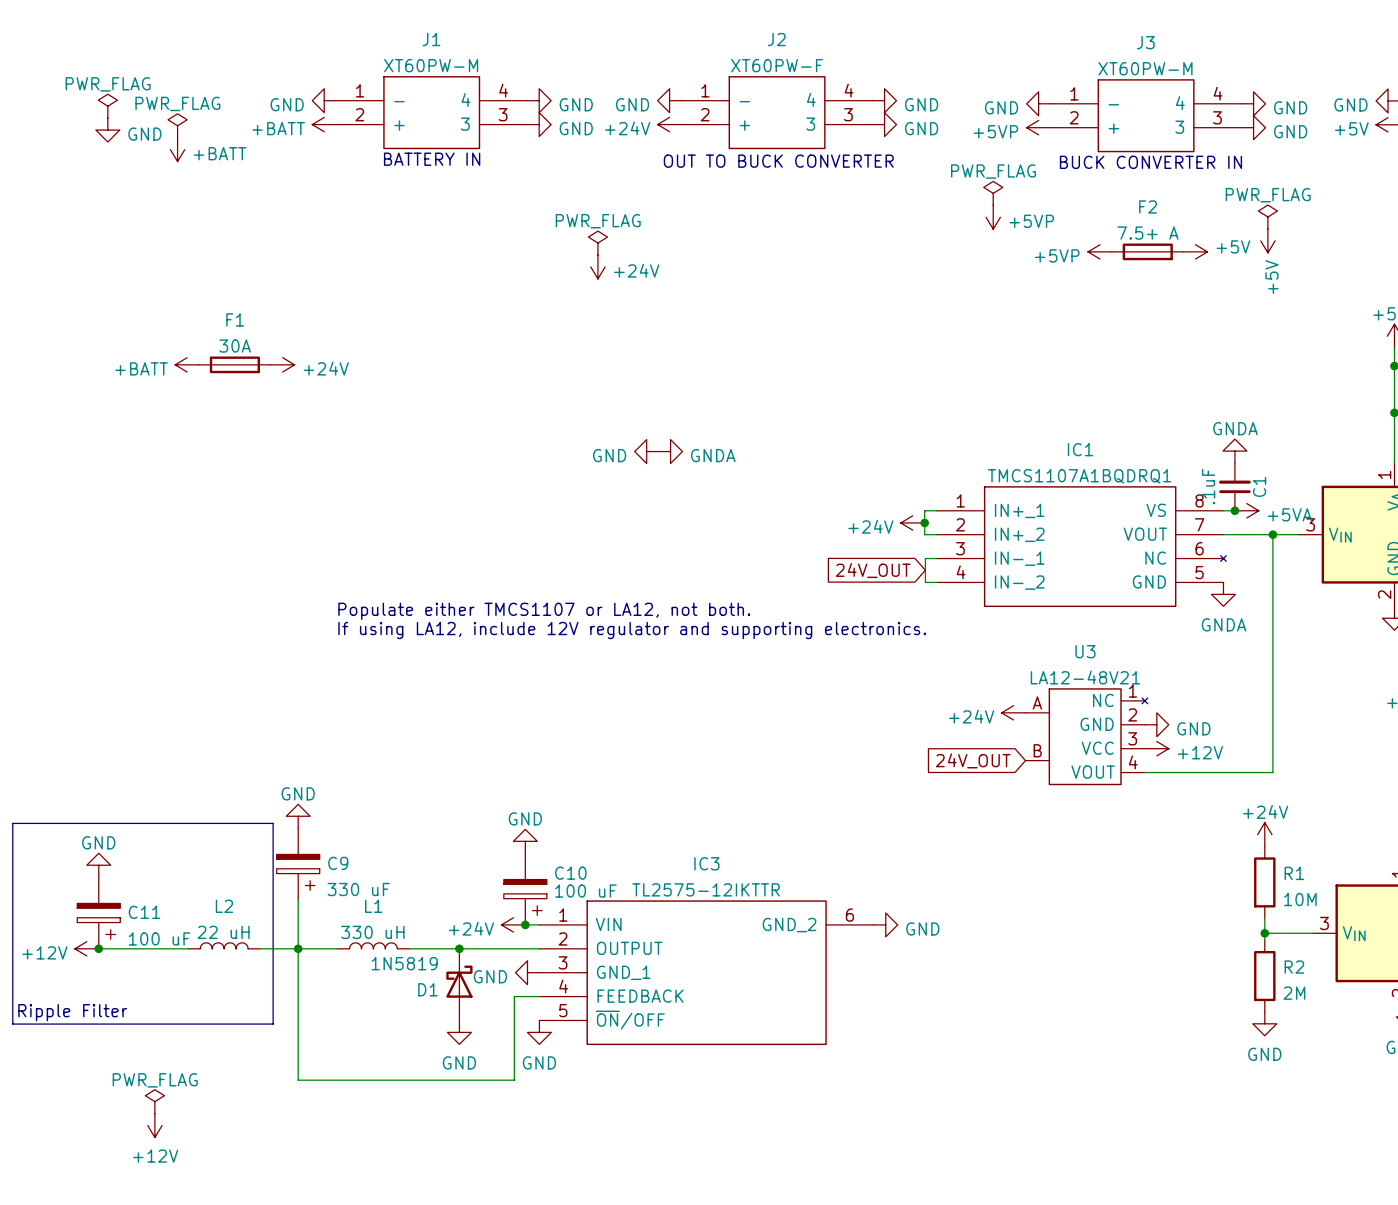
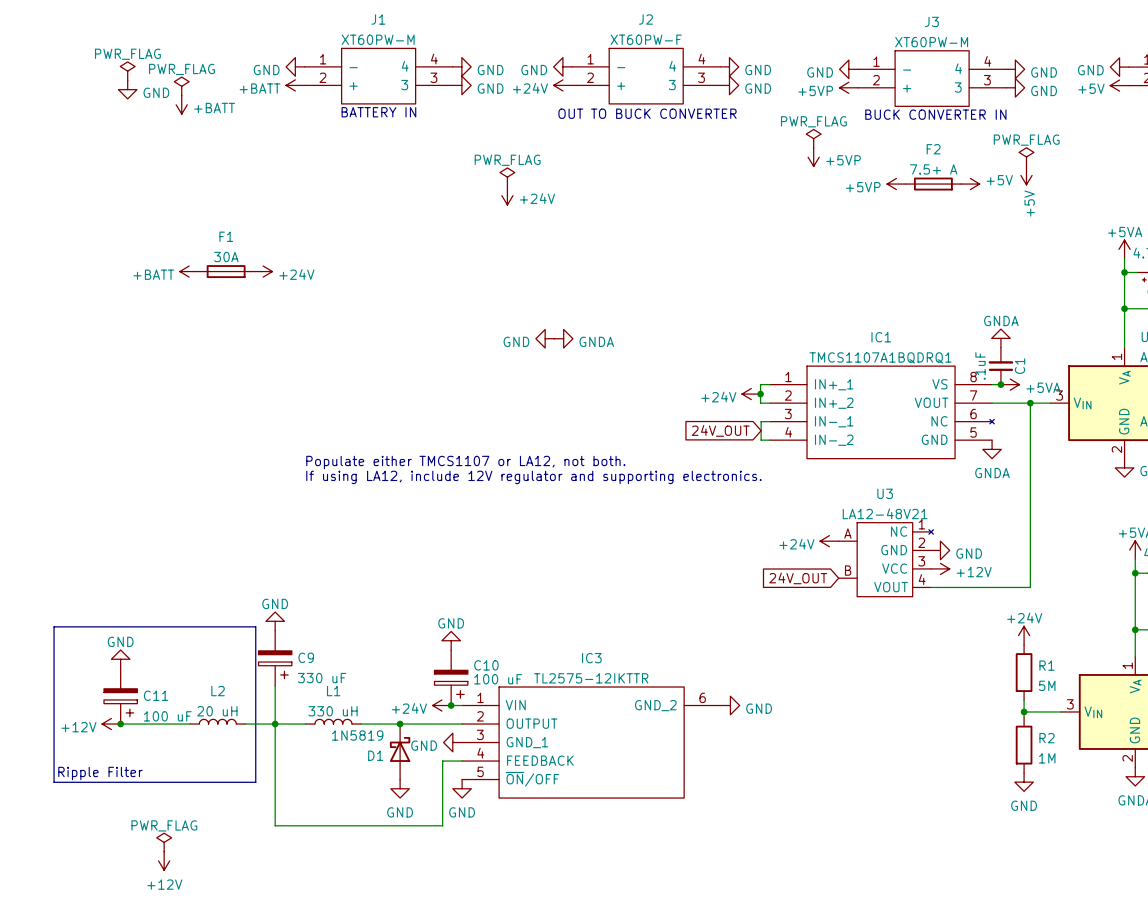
R1 value: 10M (1300, 899) -> 5M (1047, 685)
L2 value: 22 uH (223, 932) -> 20 uH (217, 711)
R2 value: 2M (1294, 993) -> 1M (1047, 758)

